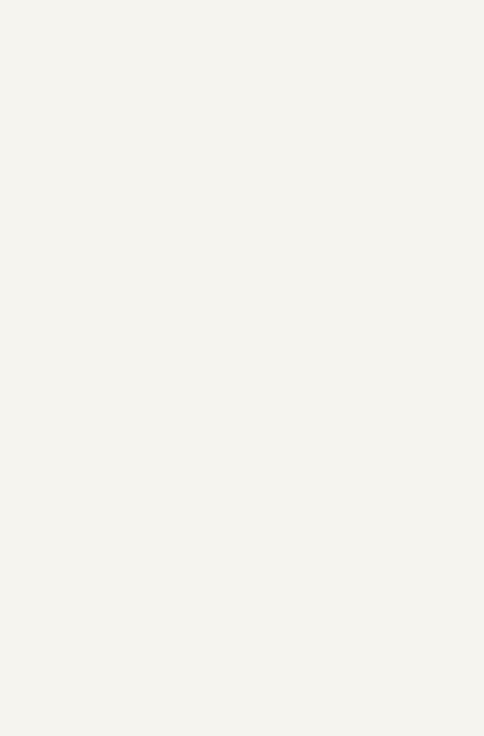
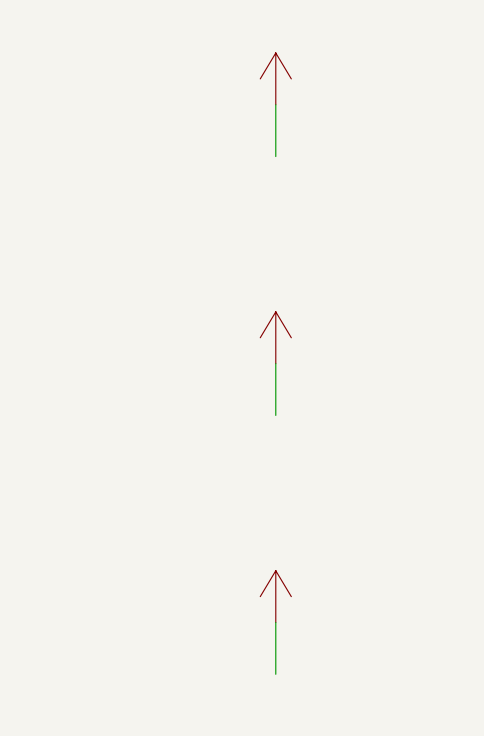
power symbol: none -> (275, 78)
wire: none -> (275, 104) (275, 156)
power symbol: none -> (275, 337)
wire: none -> (275, 363) (275, 415)
power symbol: none -> (275, 596)
wire: none -> (275, 622) (275, 674)

